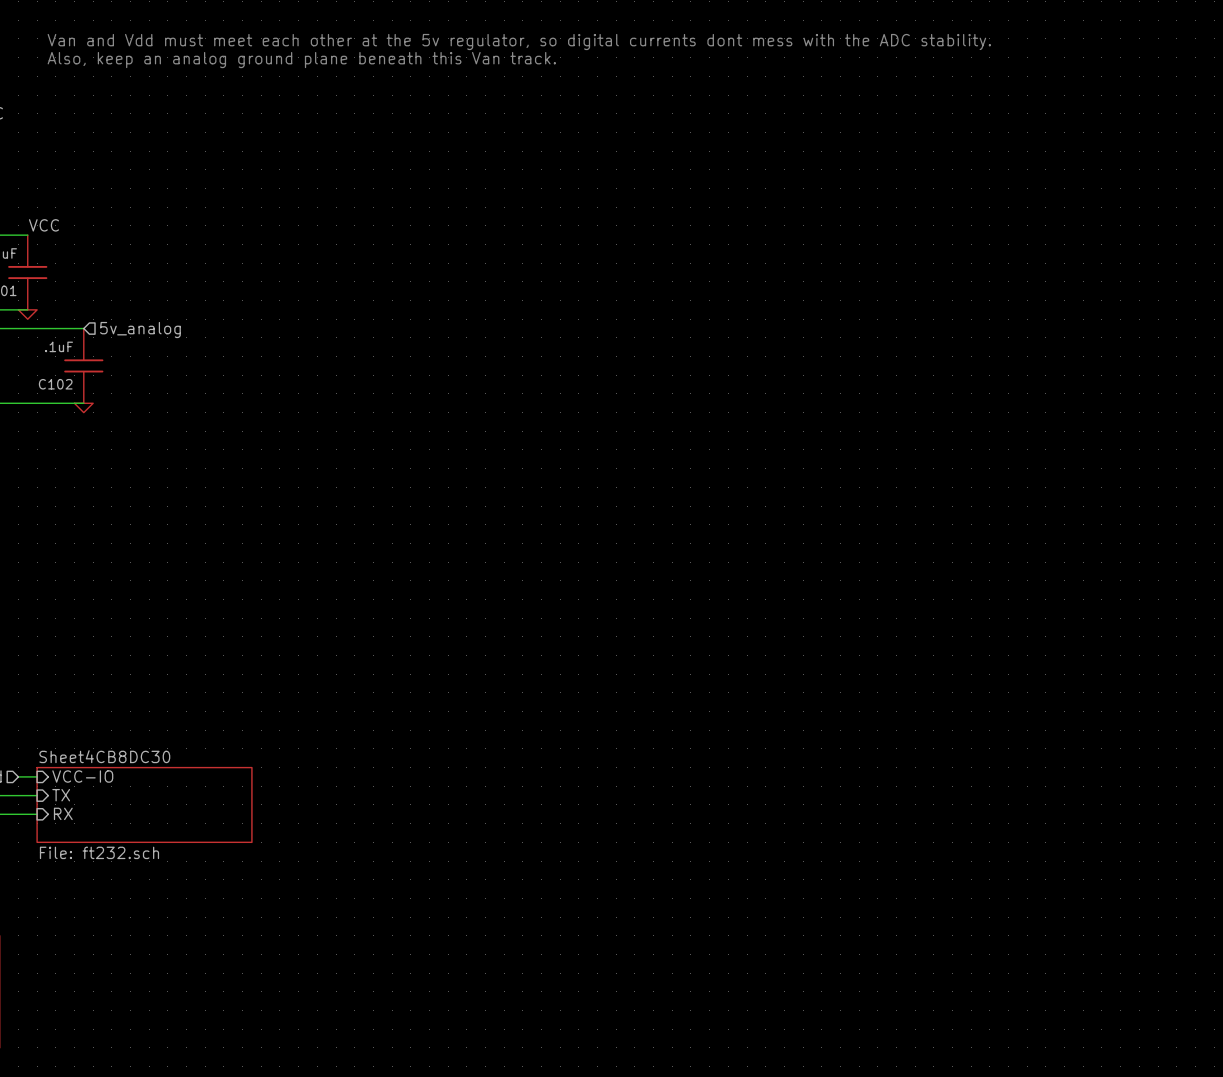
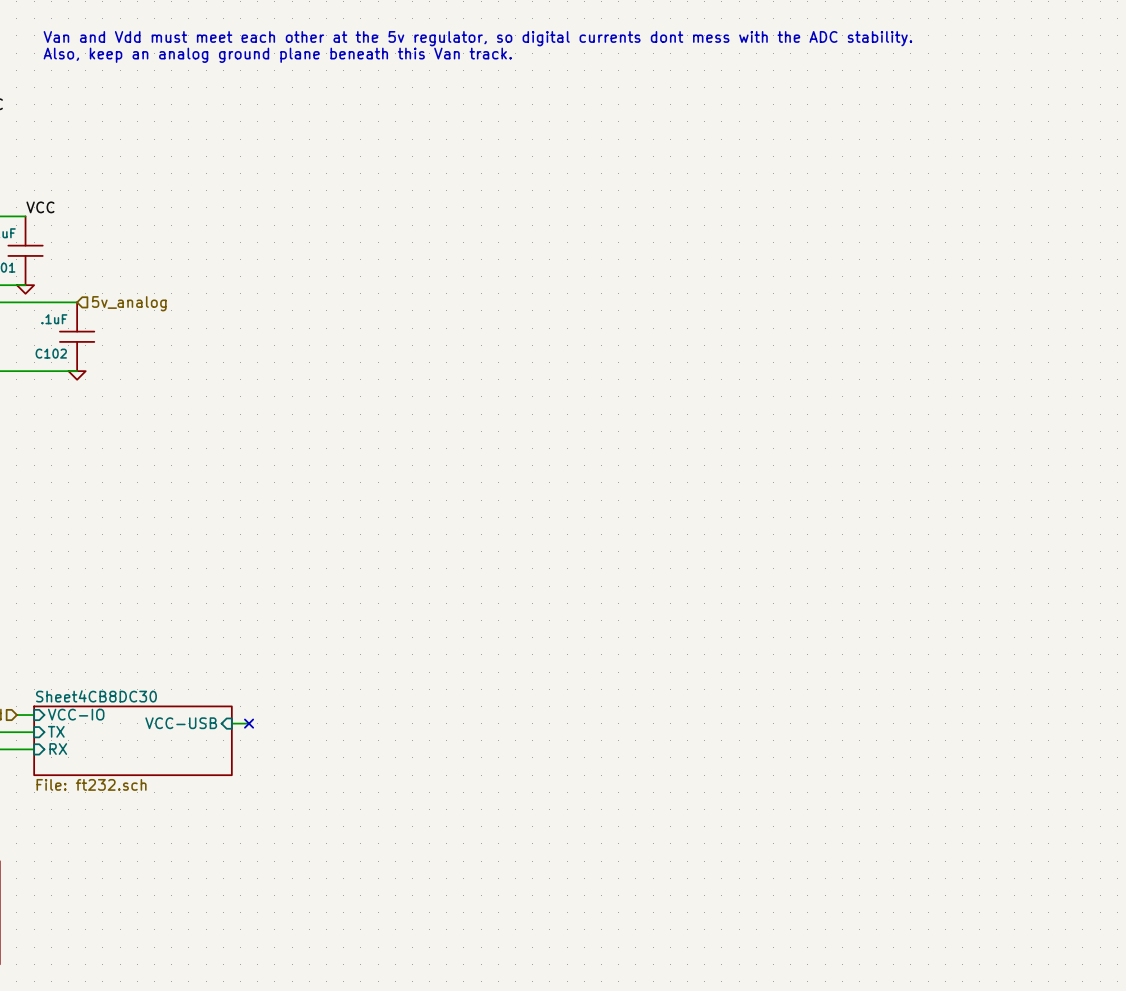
sheet pin: none -> VCC-USB (181, 723)
wire: none -> (231, 723) (249, 723)
no-connect mark: none -> (249, 723)

